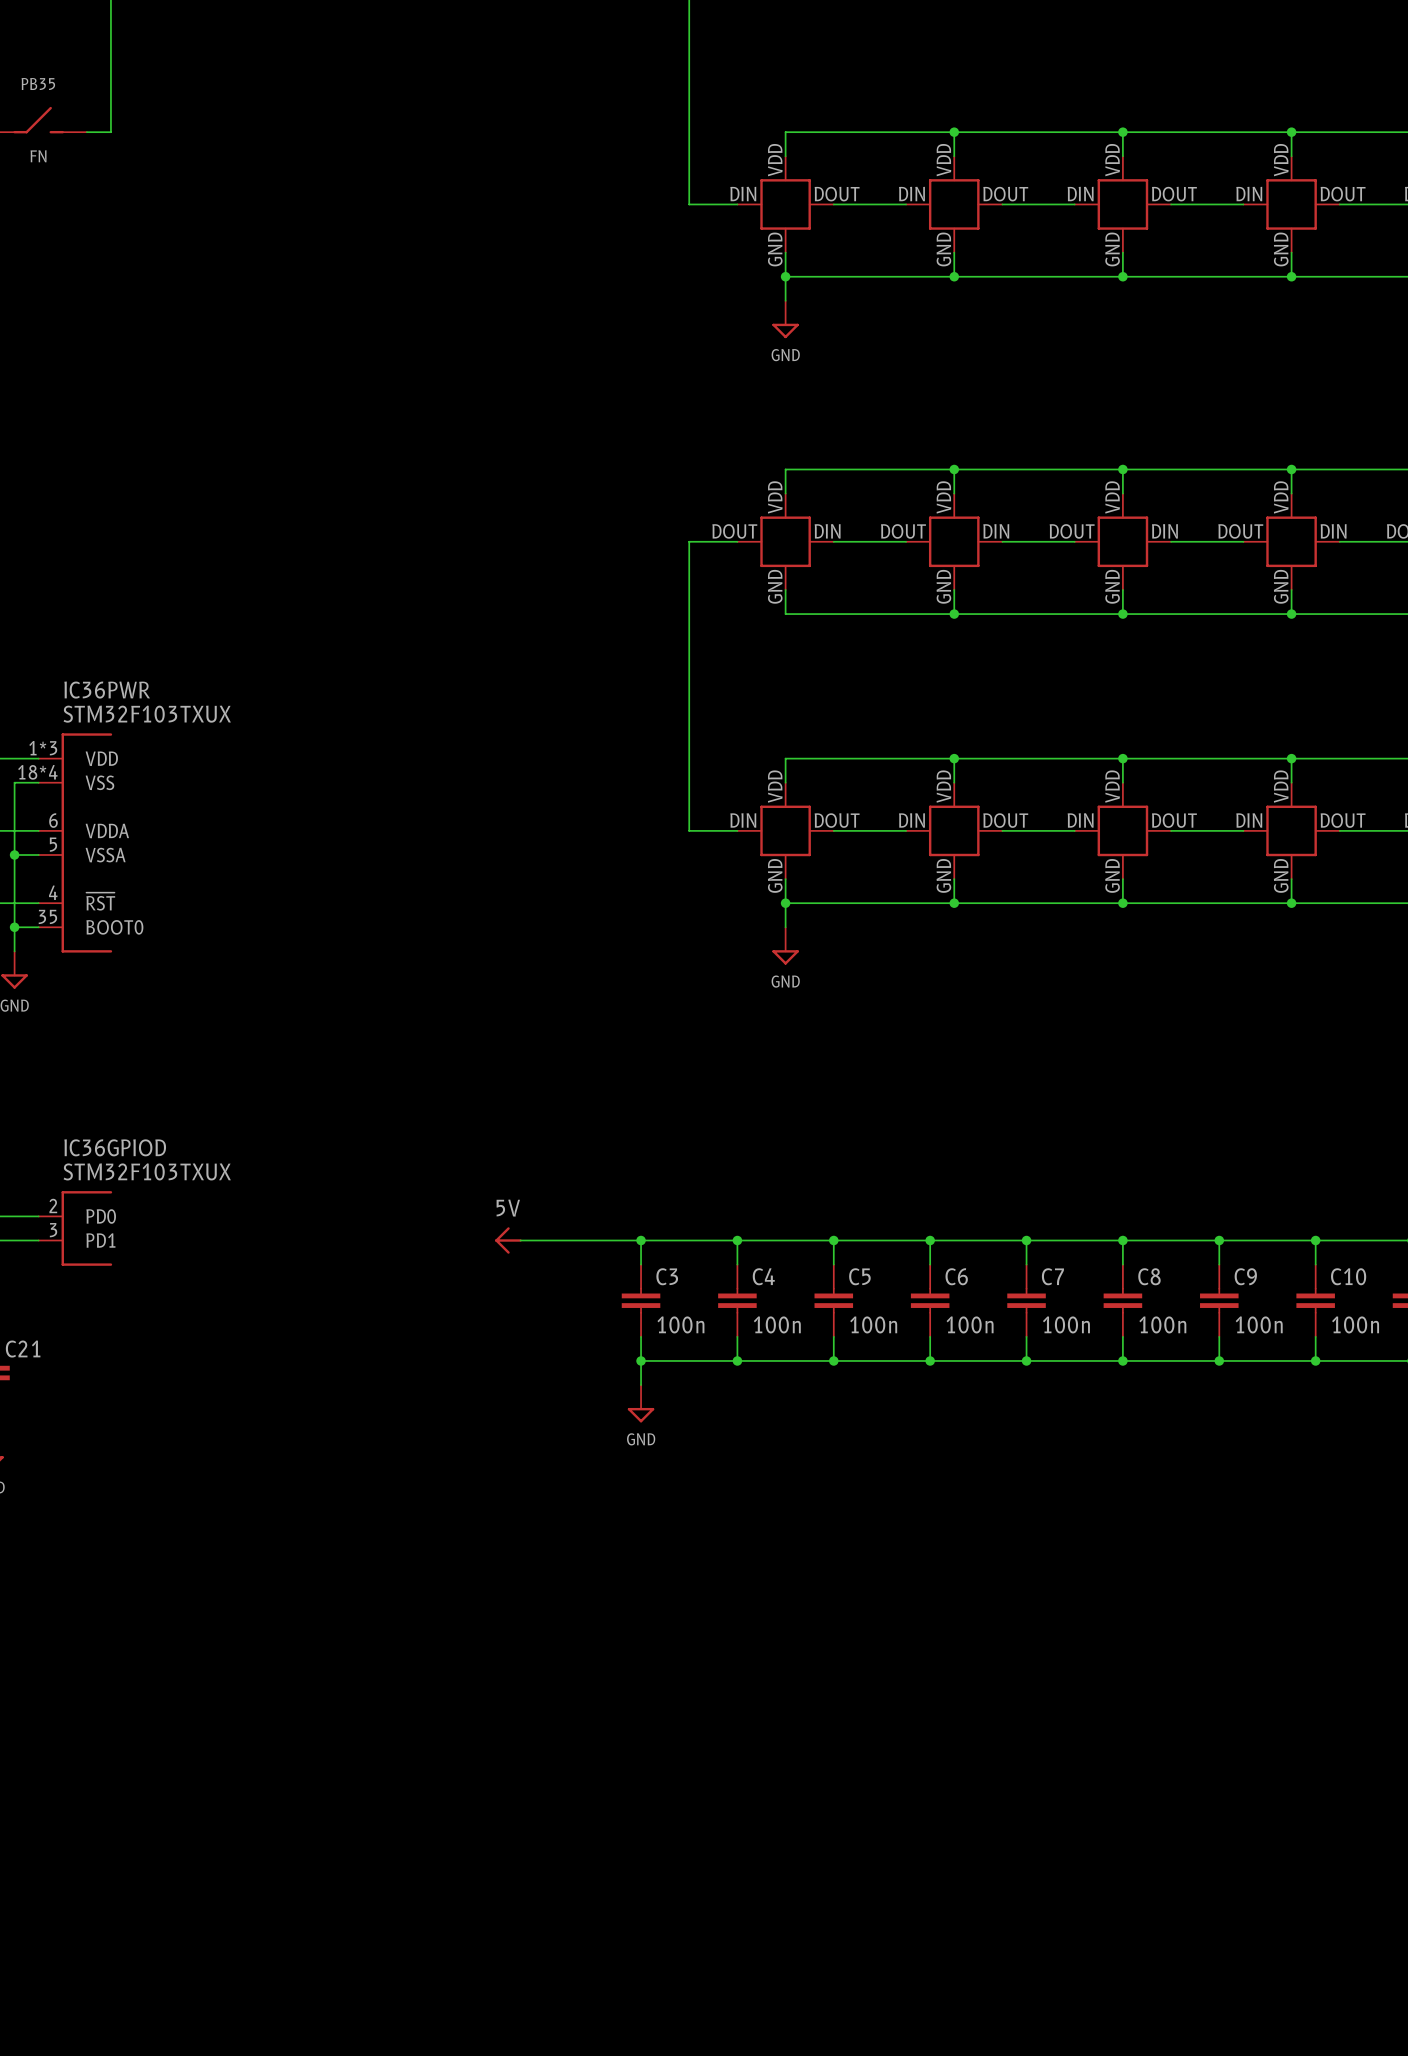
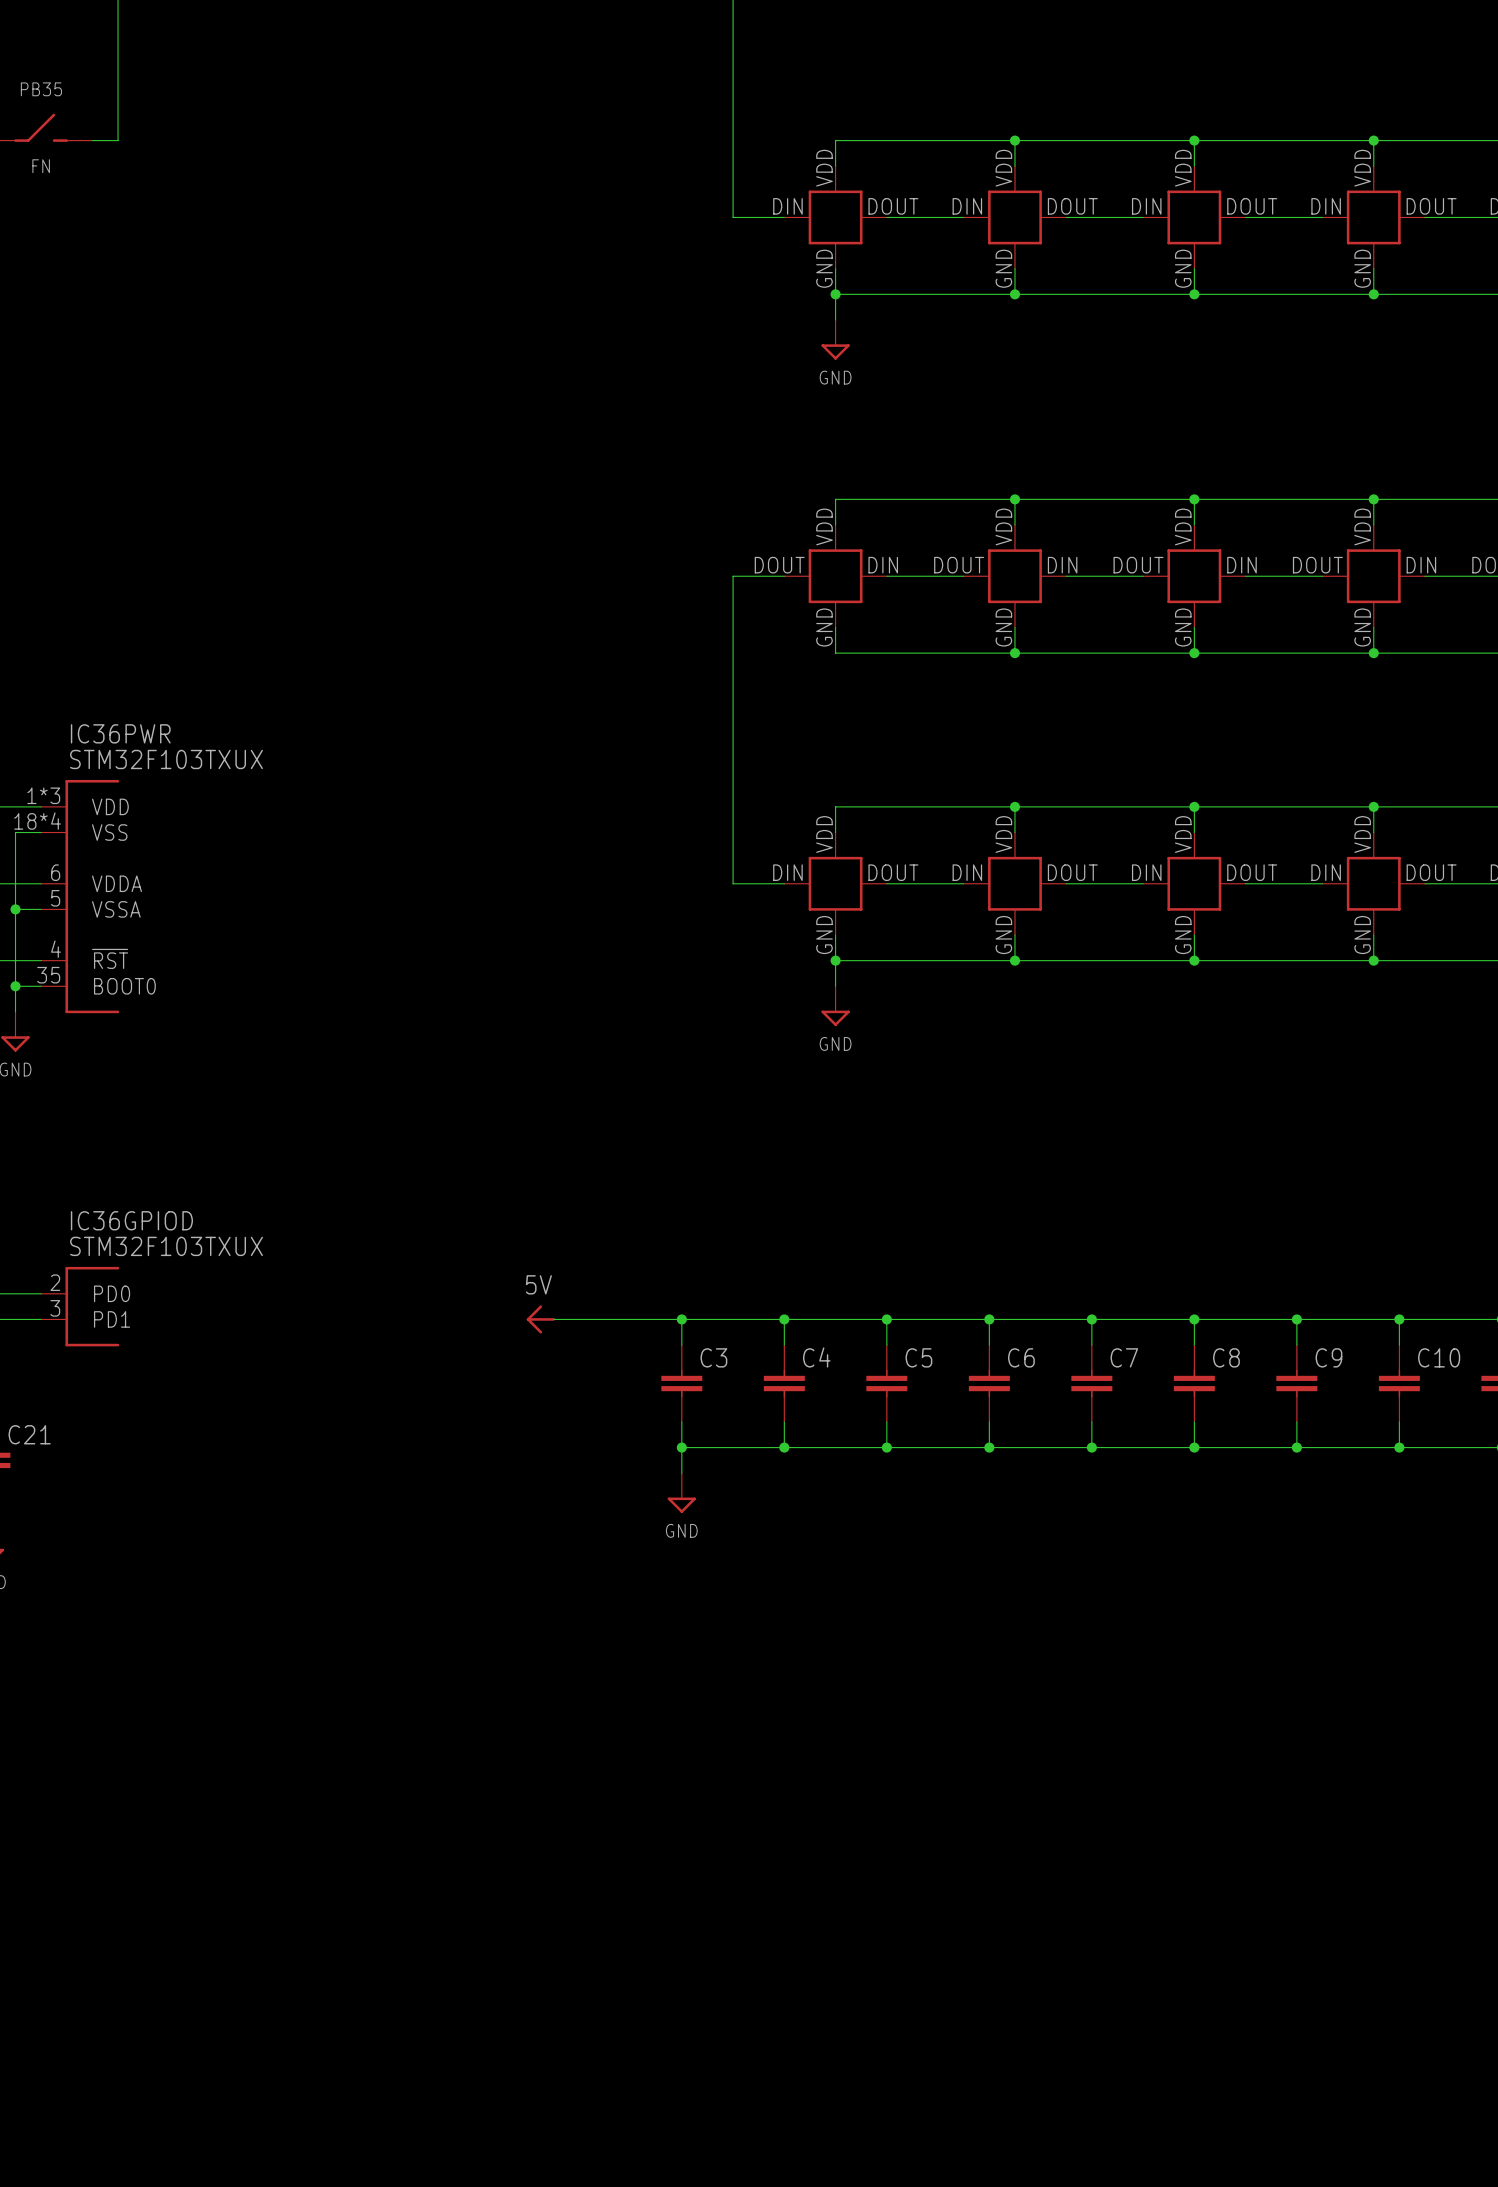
C3 value: 100n (680, 1324) -> none
C4 value: 100n (777, 1324) -> none
C5 value: 100n (873, 1324) -> none
C6 value: 100n (970, 1324) -> none
C7 value: 100n (1066, 1324) -> none
C8 value: 100n (1162, 1324) -> none
C9 value: 100n (1259, 1324) -> none
C10 value: 100n (1355, 1324) -> none

